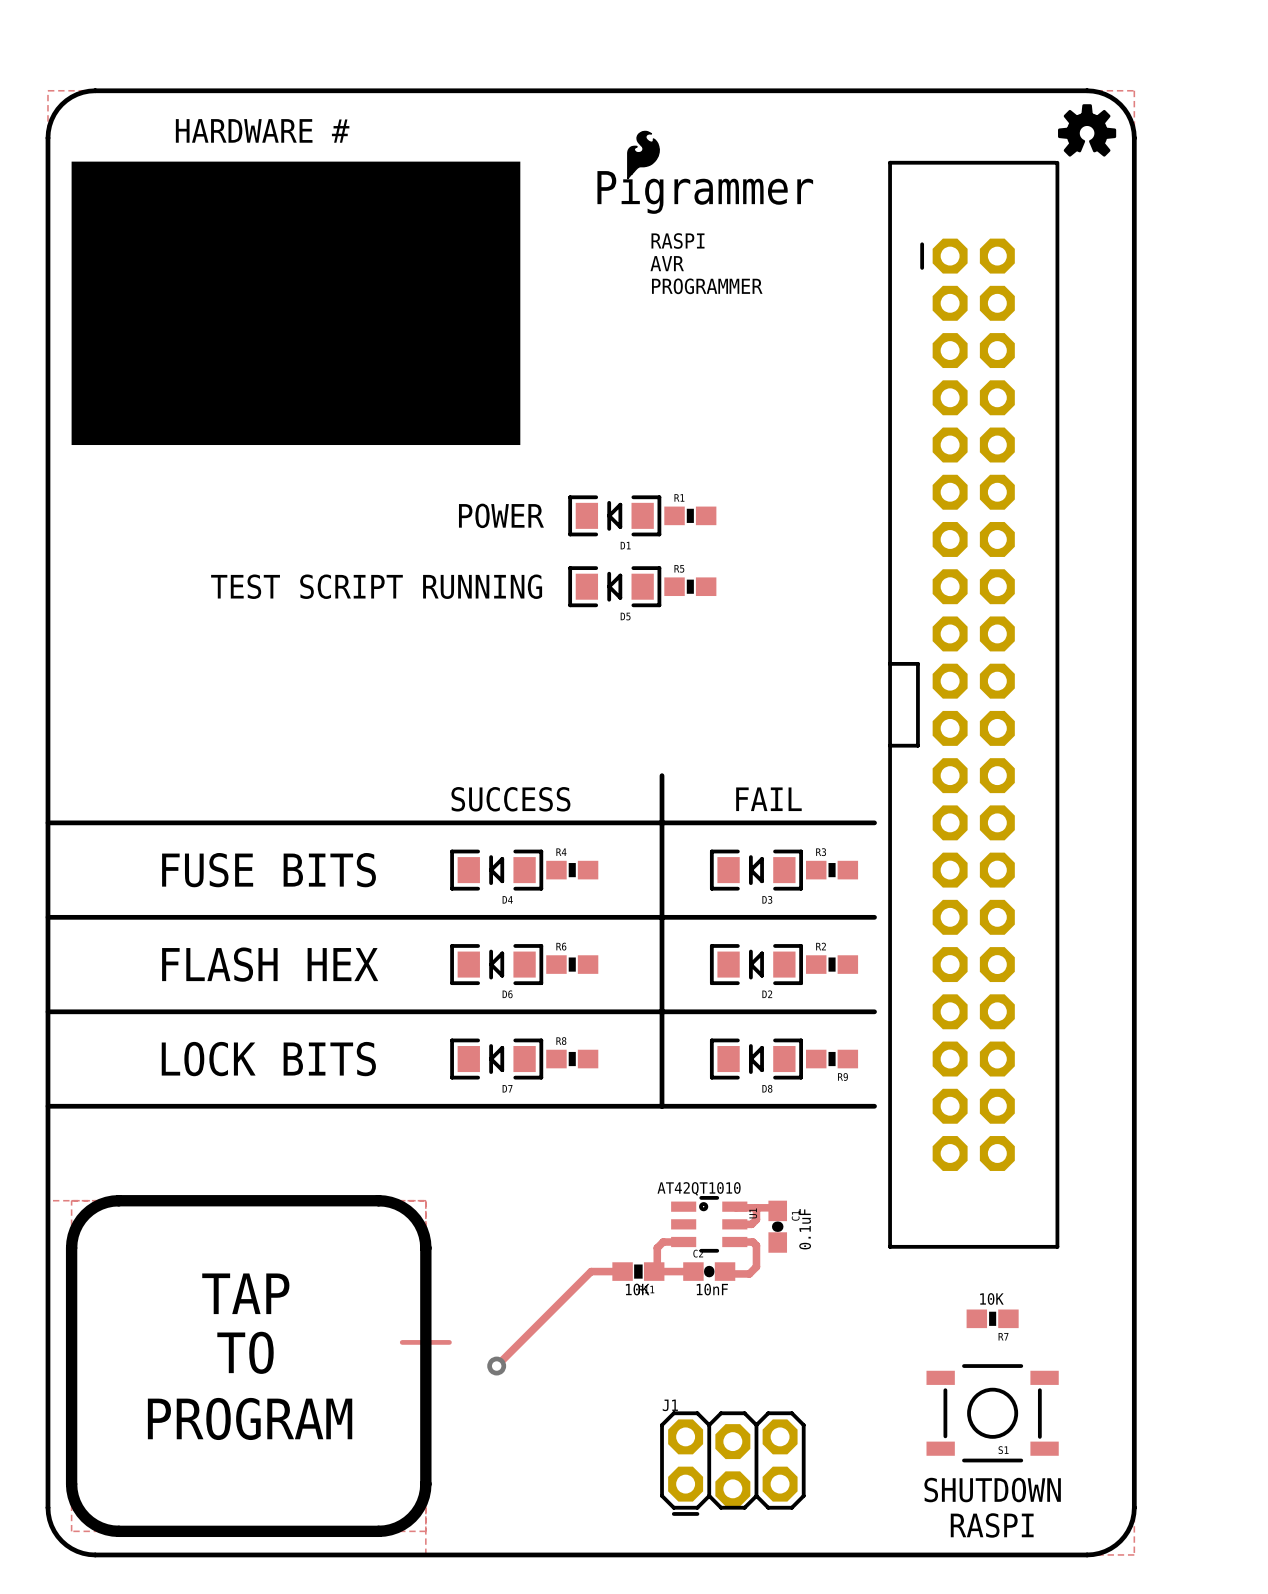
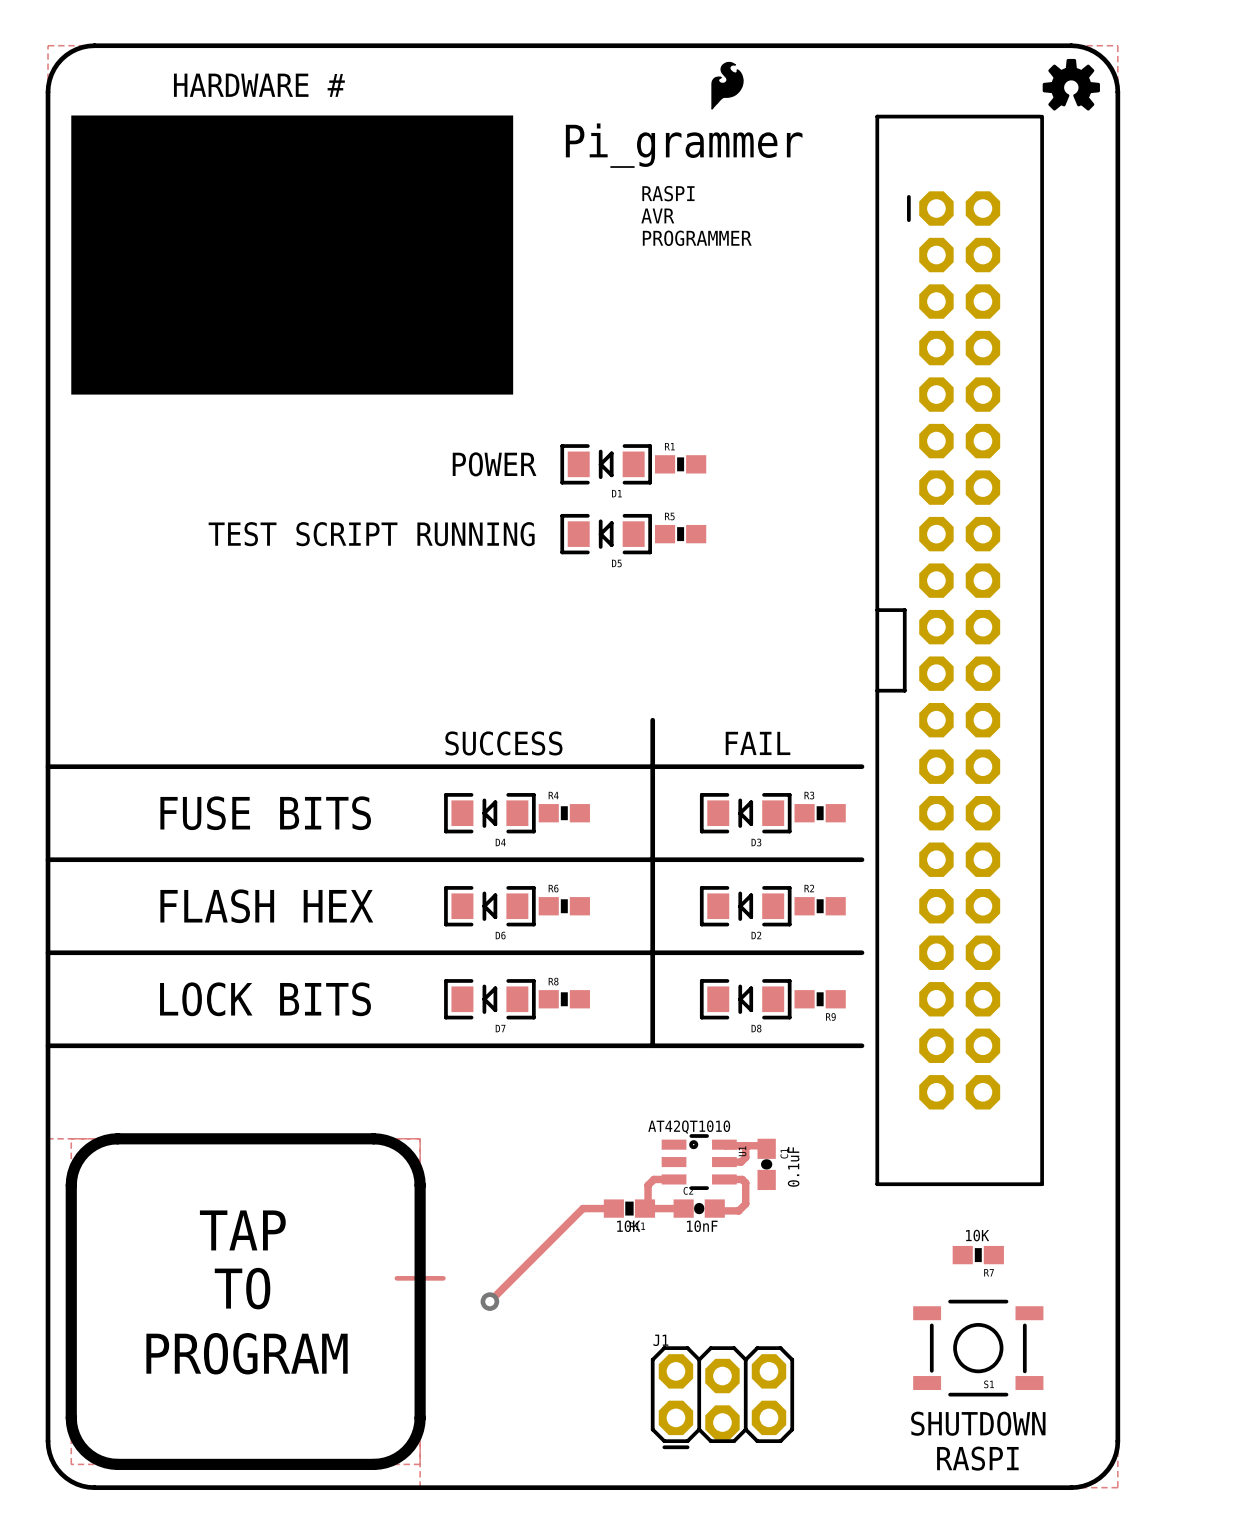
drawing position: (643, 155) -> (727, 85)
text: Pigrammer (705, 191) -> Pi_grammer (684, 145)

